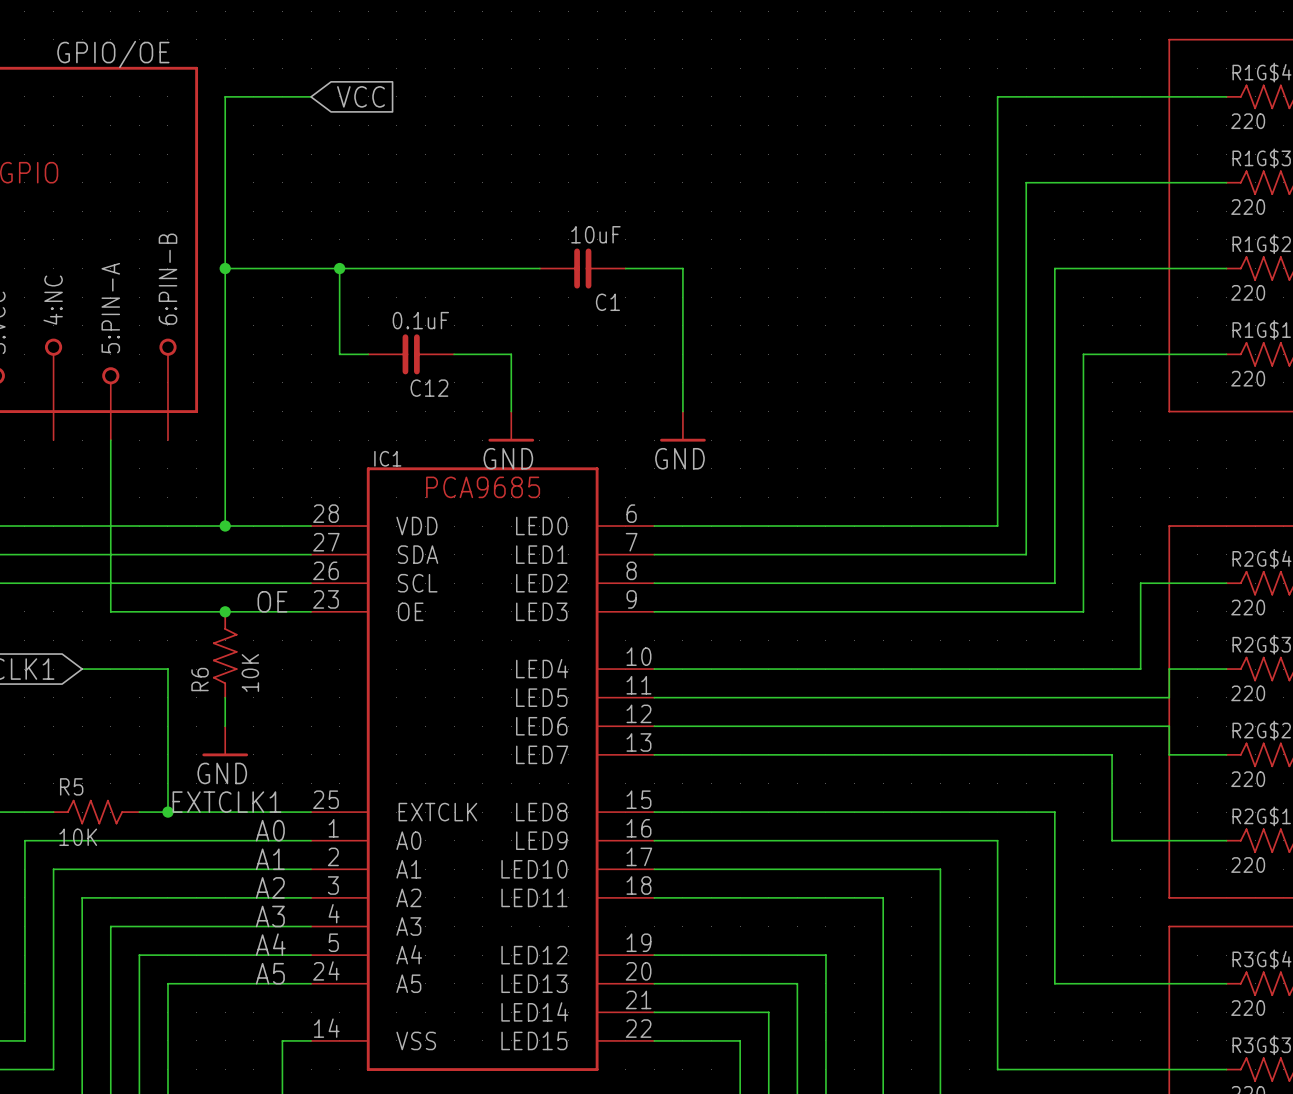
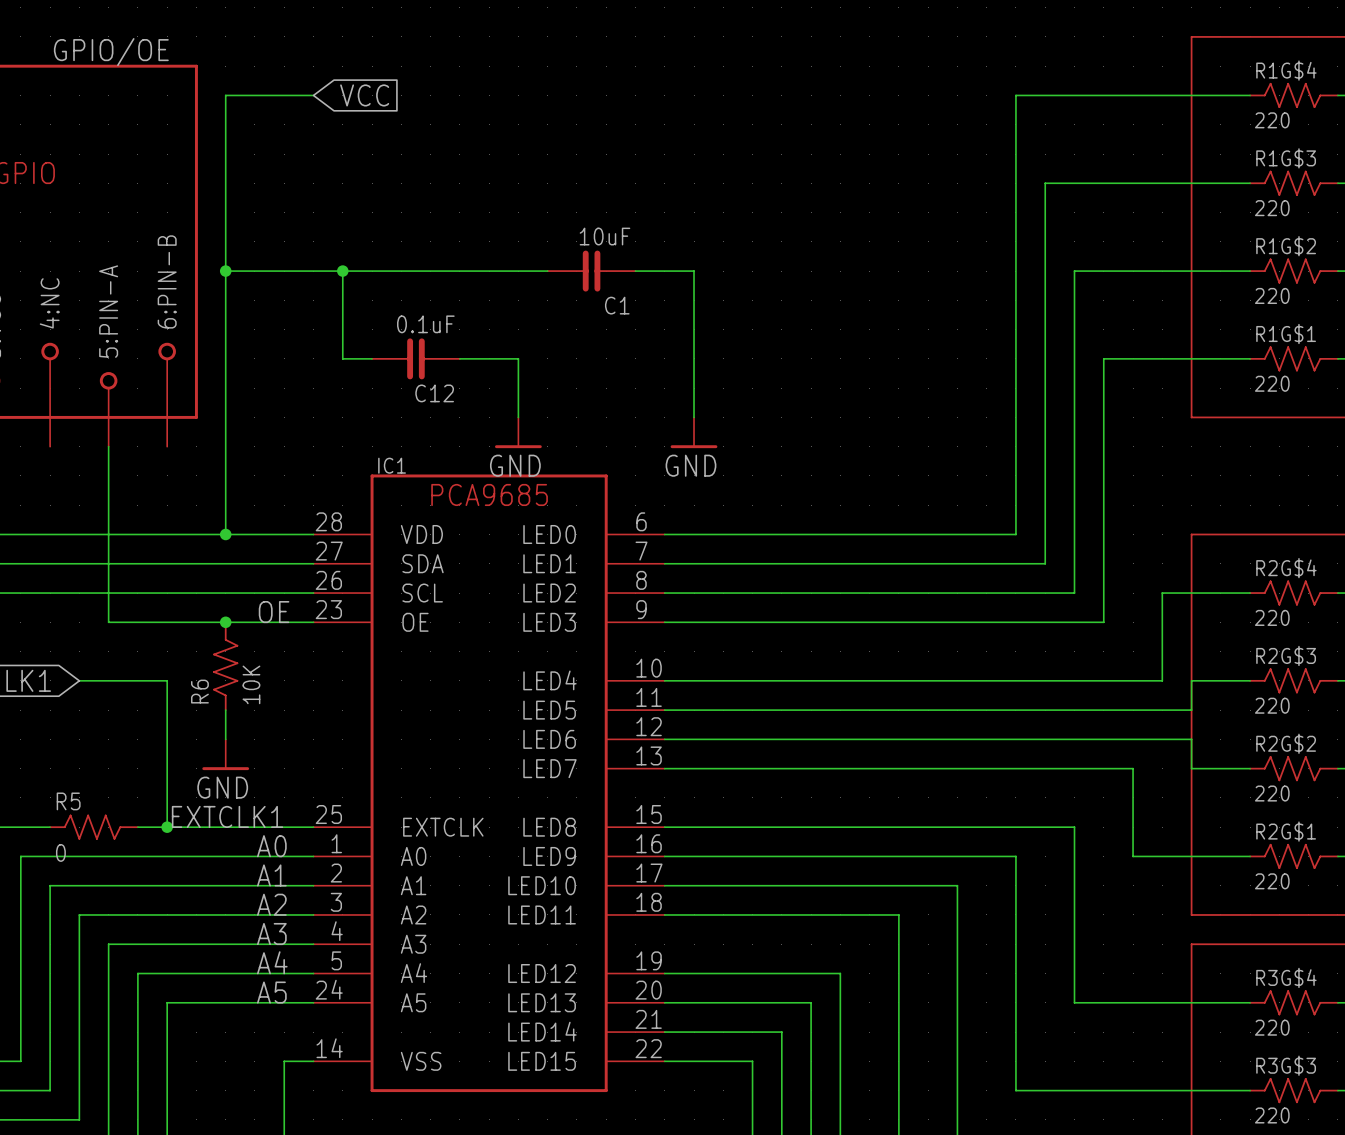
R5 value: 10K (78, 837) -> 0 (60, 852)

